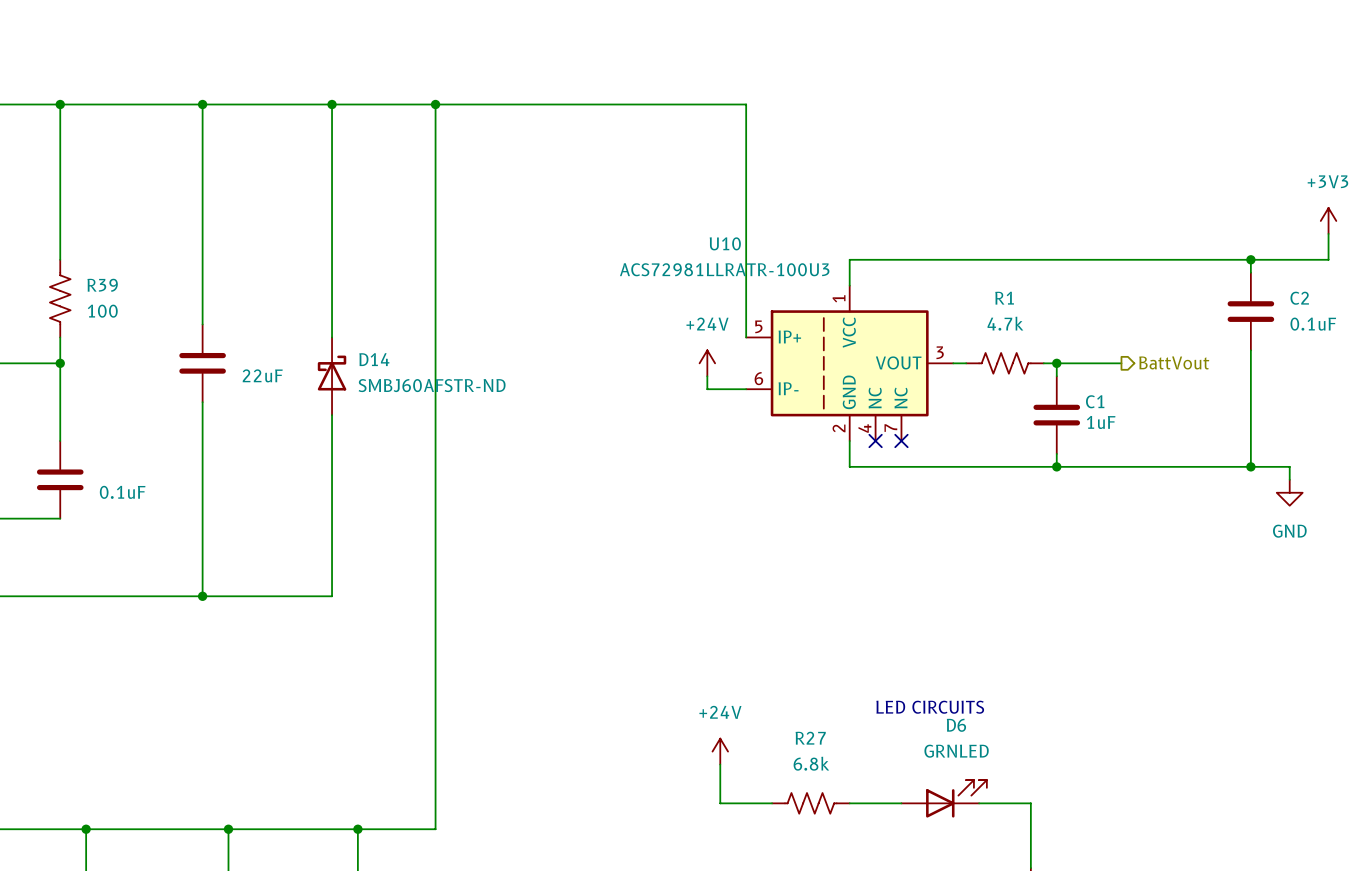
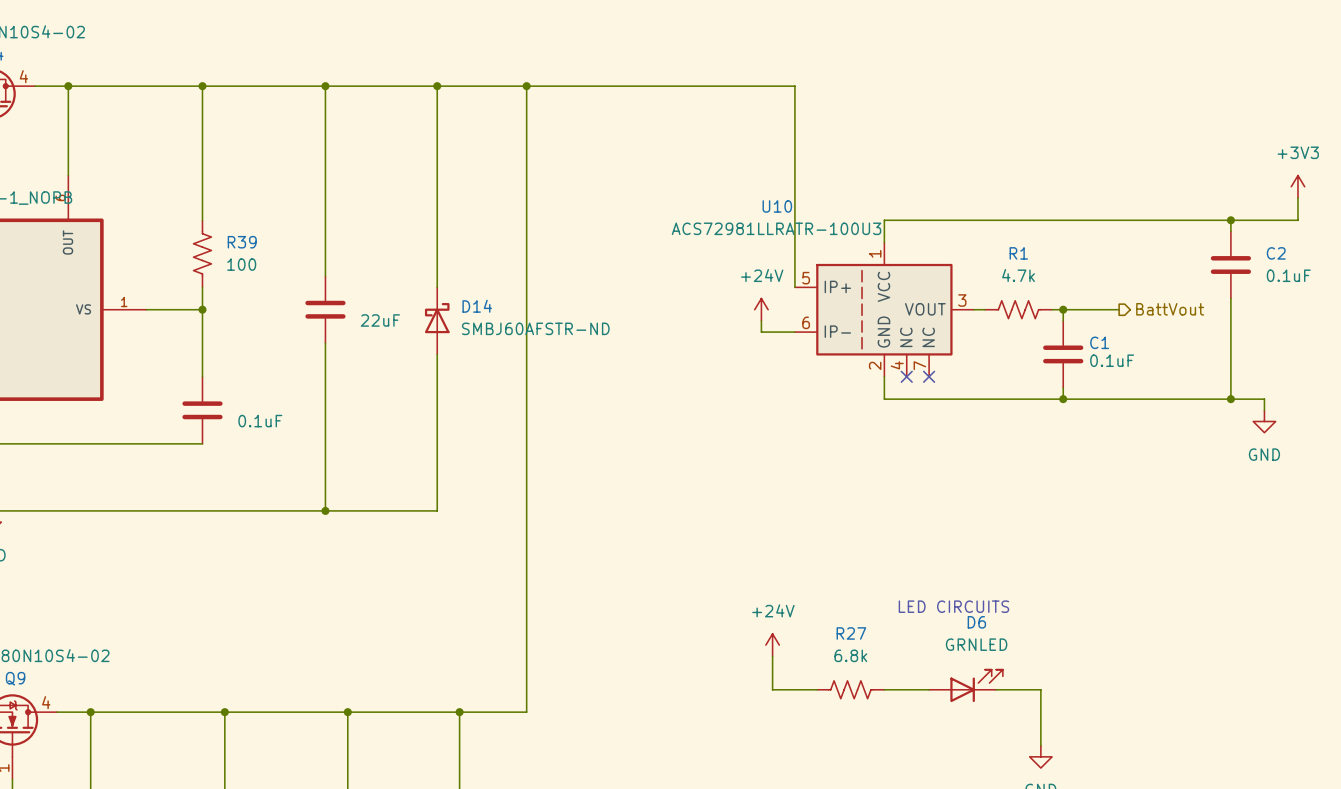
C1 value: 1uF (1101, 422) -> 0.1uF (1112, 360)

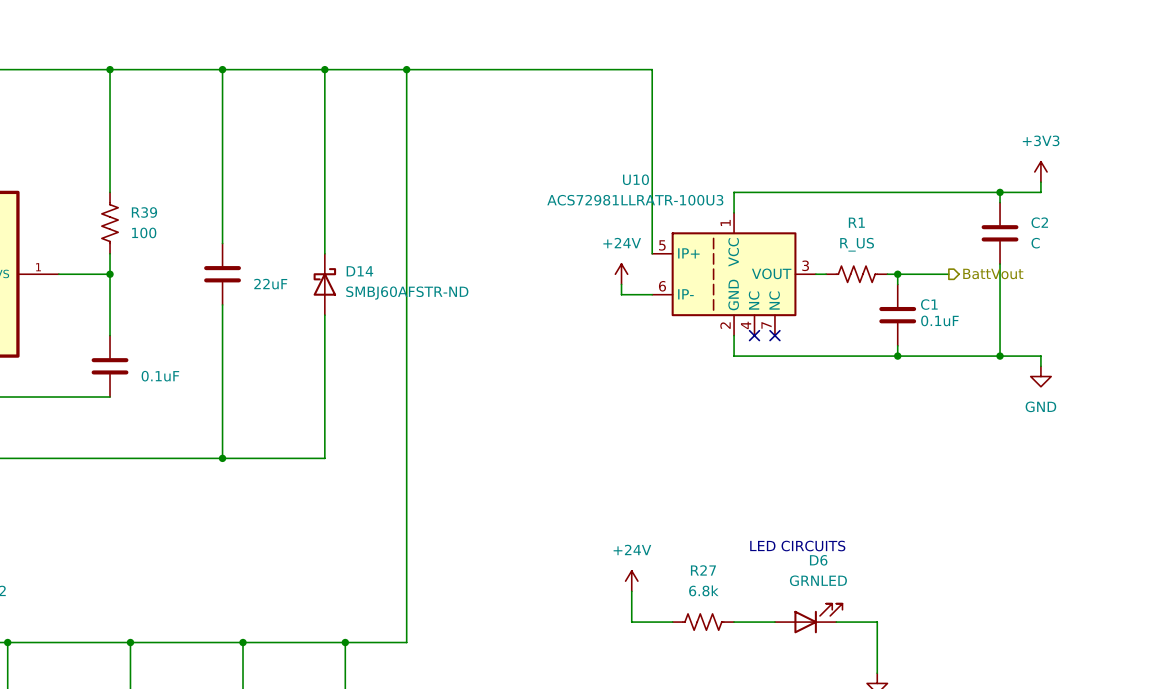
power symbol position: +3V3 (1297, 186) -> +3V3 (1040, 171)
wire: (1297, 197) (1297, 220) (1219, 220) -> (1040, 182) (1040, 192)
junction: none -> (1000, 192)
wire: (1230, 220) (1230, 231) -> (1000, 192) (1000, 202)
junction: (1230, 220) -> none
C2 position: (1230, 265) -> (1000, 233)
R1 value: 4.7k (1018, 275) -> R_US (857, 244)
C2 value: 0.1uF (1288, 275) -> C (1035, 243)
wire: (1230, 298) (1230, 399) -> (1000, 264) (1000, 356)
junction: none -> (1000, 356)
wire: (1219, 399) (1264, 399) (1264, 410) -> (1040, 356) (1040, 366)
junction: (1230, 399) -> none
power symbol position: GND (1264, 421) -> GND (1040, 376)

